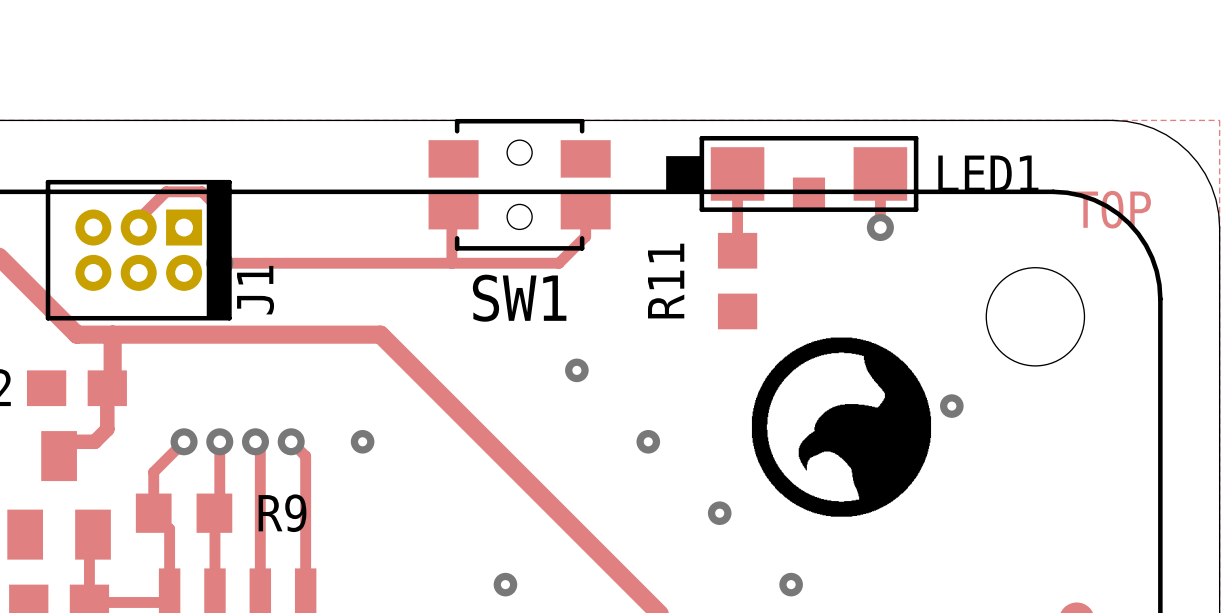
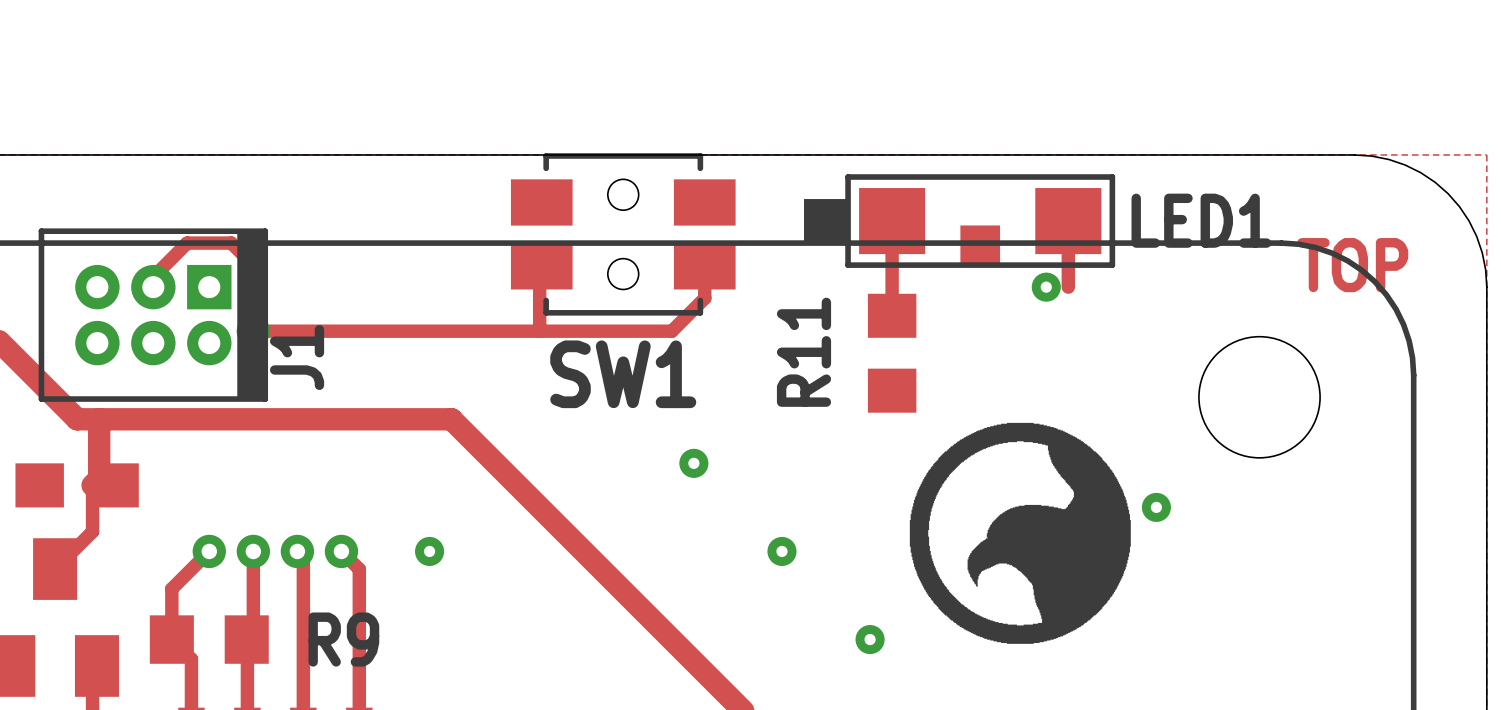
via position: (880, 227) -> (1046, 287)
track: (112, 334) (112, 382) (107, 388) (107, 429) (94, 441) (59, 441) (59, 456) -> (99, 419) (99, 478) (92, 485) (92, 531) (55, 569)

